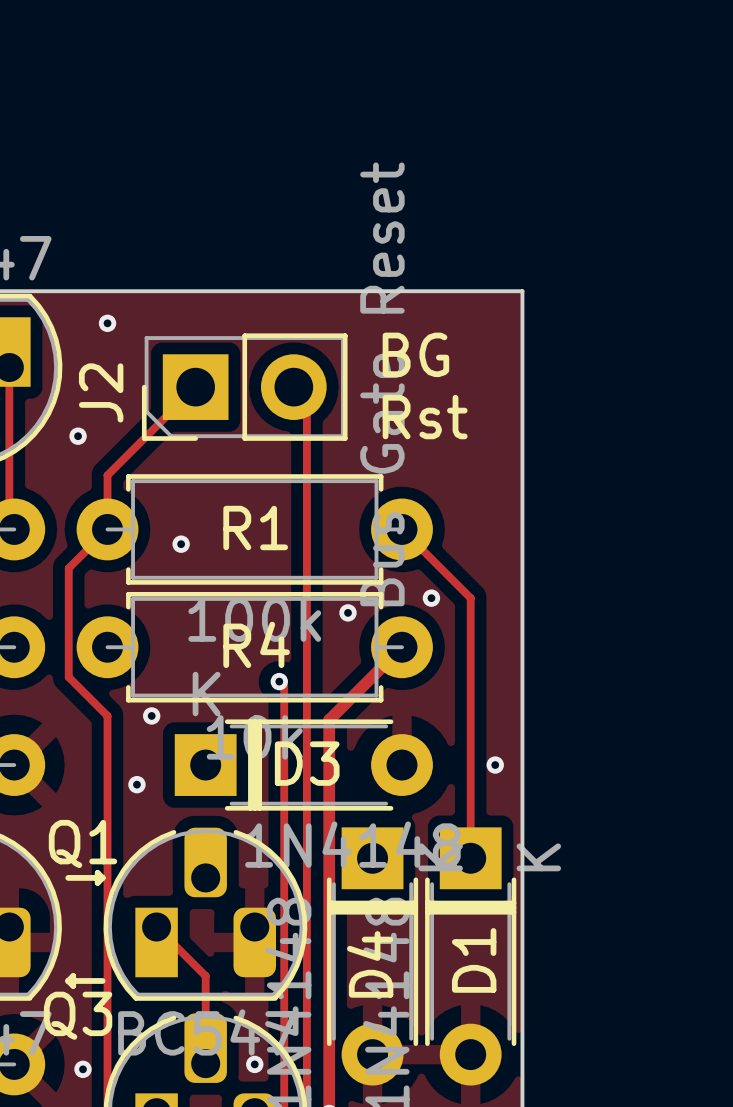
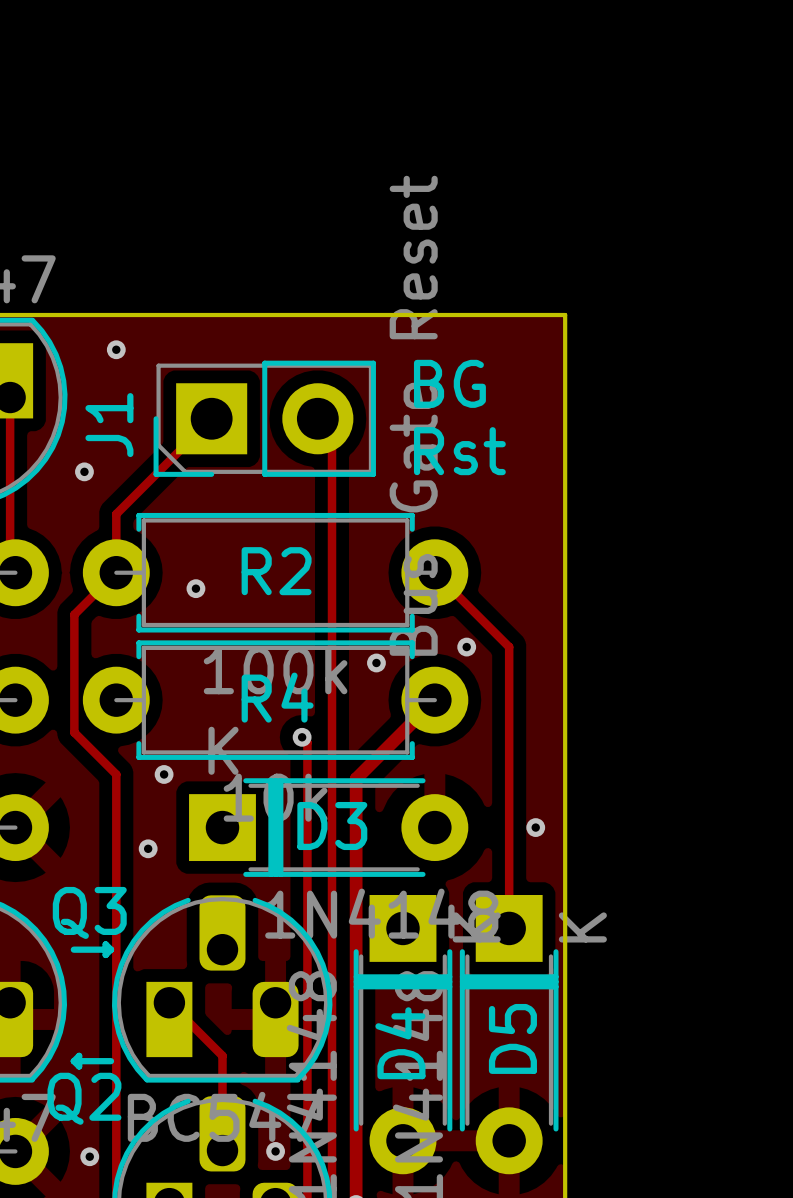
J2 name: J2 (101, 392) -> J1 (109, 425)
R1 name: R1 (255, 528) -> R2 (276, 571)
Q1 name: Q1 (82, 843) -> Q3 (89, 912)
D1 name: D1 (474, 960) -> D5 (512, 1038)
Q3 name: Q3 (78, 1015) -> Q2 (84, 1098)

